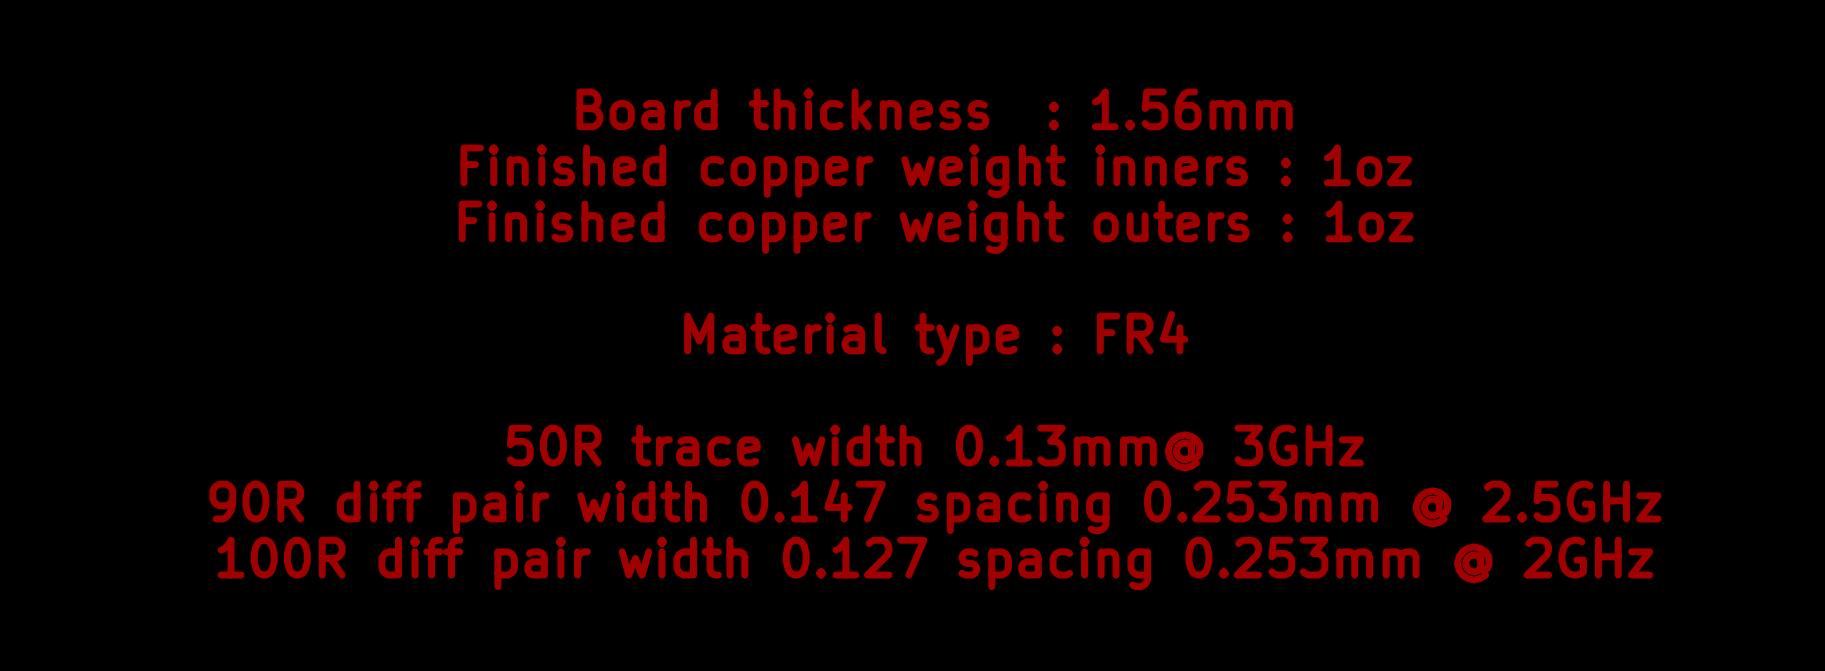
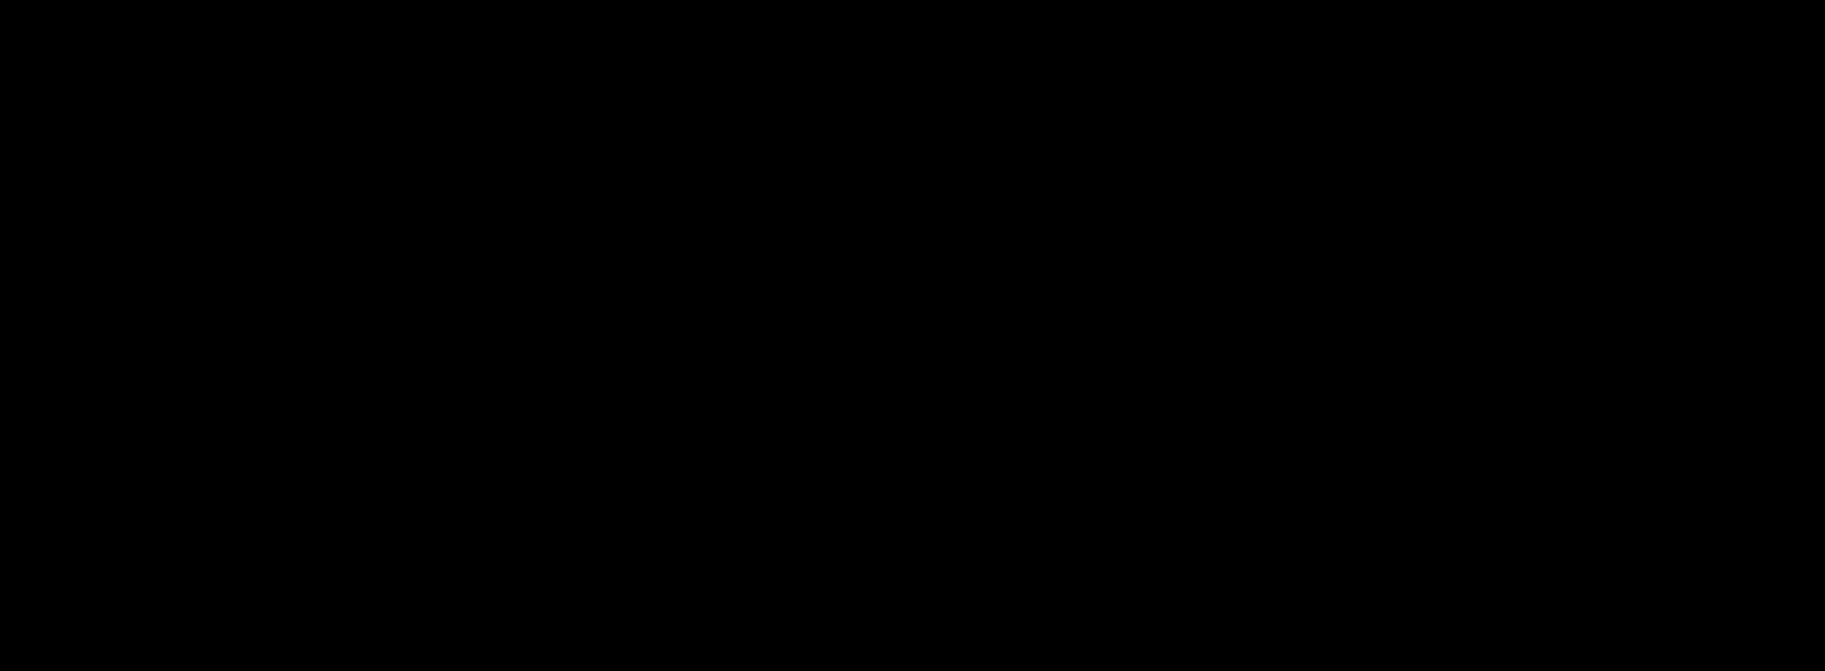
text: Board thickness : 1.56mm (934, 109) -> none
text: Finished copper weight inners : 1oz (936, 171) -> none
text: Finished copper weight outers : 1oz (936, 227) -> none
text: Material type : FR4 (936, 338) -> none
text: 50R trace width 0.13mm@ 3GHz (935, 448) -> none
text: 90R diff pair width 0.147 spacing 0.253mm @ 2.5GHz (935, 506) -> none
text: 100R diff pair width 0.127 spacing 0.253mm @ 2GHz (935, 563) -> none

